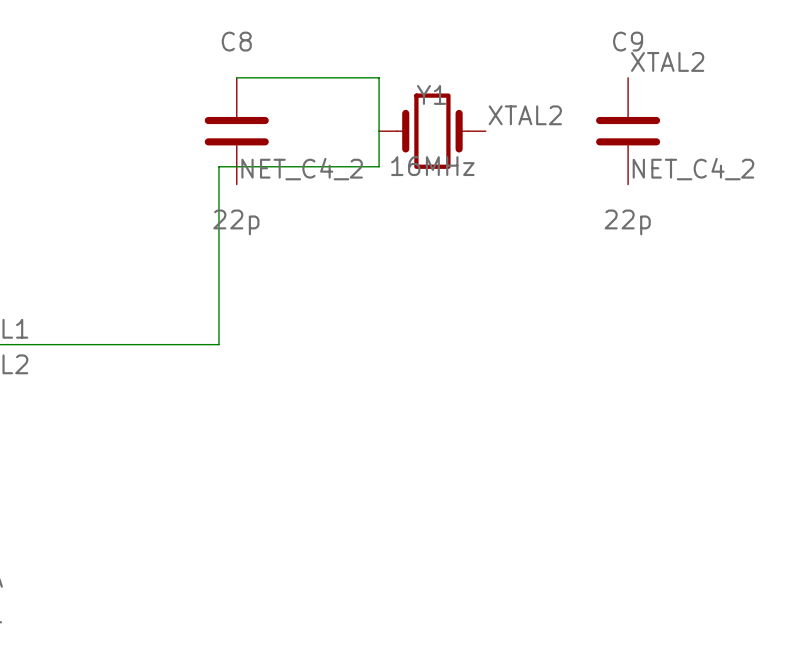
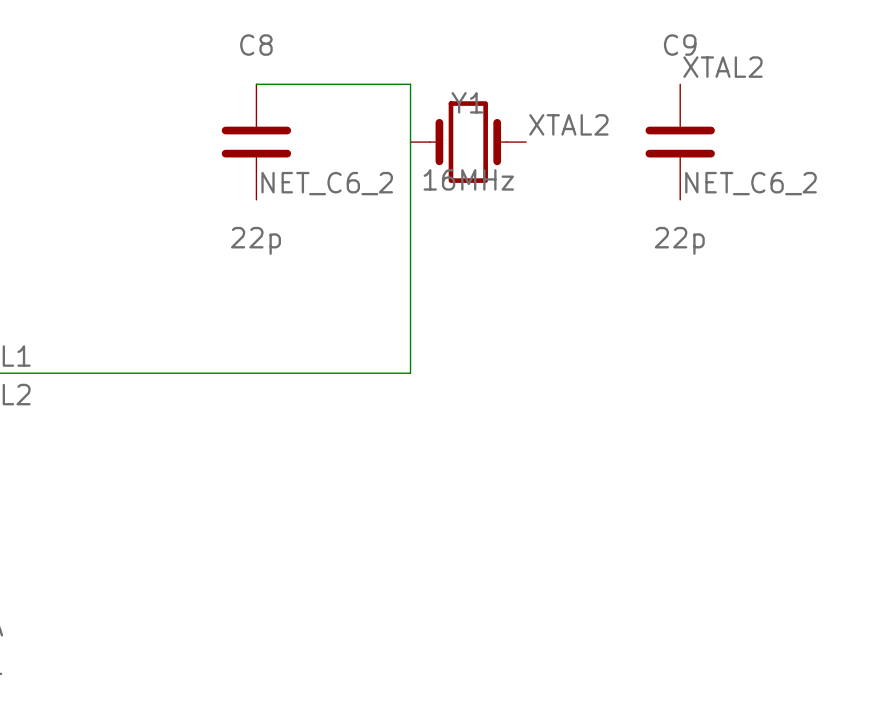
wire: (379, 166) (218, 166) (218, 344) -> (410, 180) (410, 373) (237, 373)
label: NET_C4_2 (302, 169) -> NET_C6_2 (327, 183)
label: NET_C4_2 (693, 169) -> NET_C6_2 (750, 183)

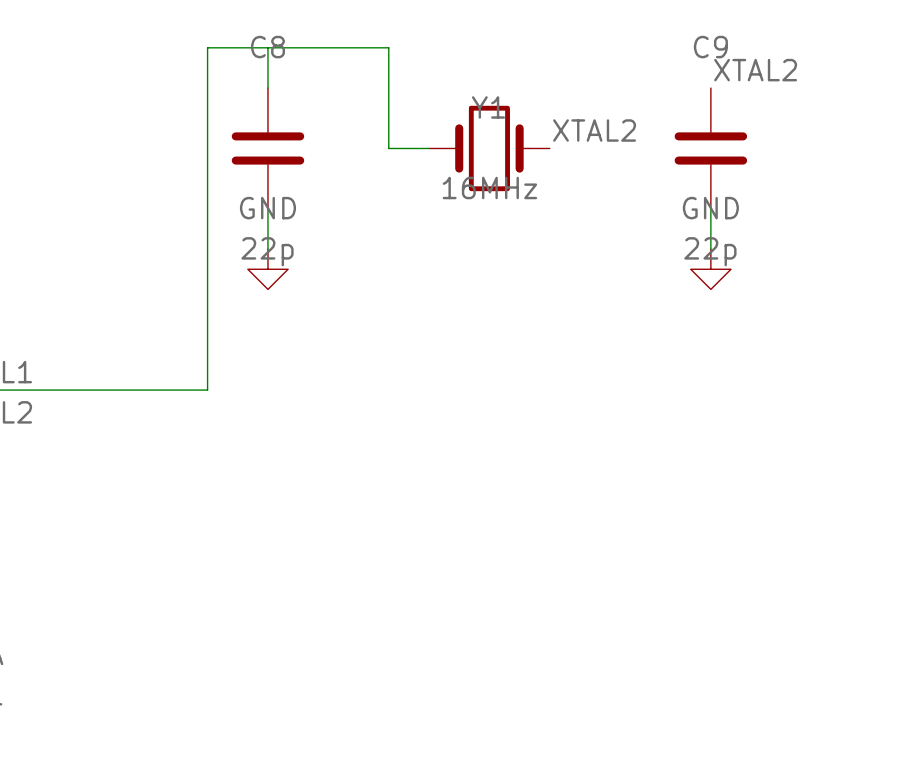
wire: none -> (267, 47) (267, 88)
wire: (256, 84) (410, 84) (410, 373) (198, 373) -> (429, 148) (388, 148) (388, 47) (207, 47) (207, 390)
label: NET_C6_2 (327, 183) -> none
label: NET_C6_2 (750, 183) -> none
wire: none -> (267, 208) (267, 249)
wire: none -> (710, 208) (710, 249)
power symbol: none -> GND (267, 269)
power symbol: none -> GND (710, 269)

